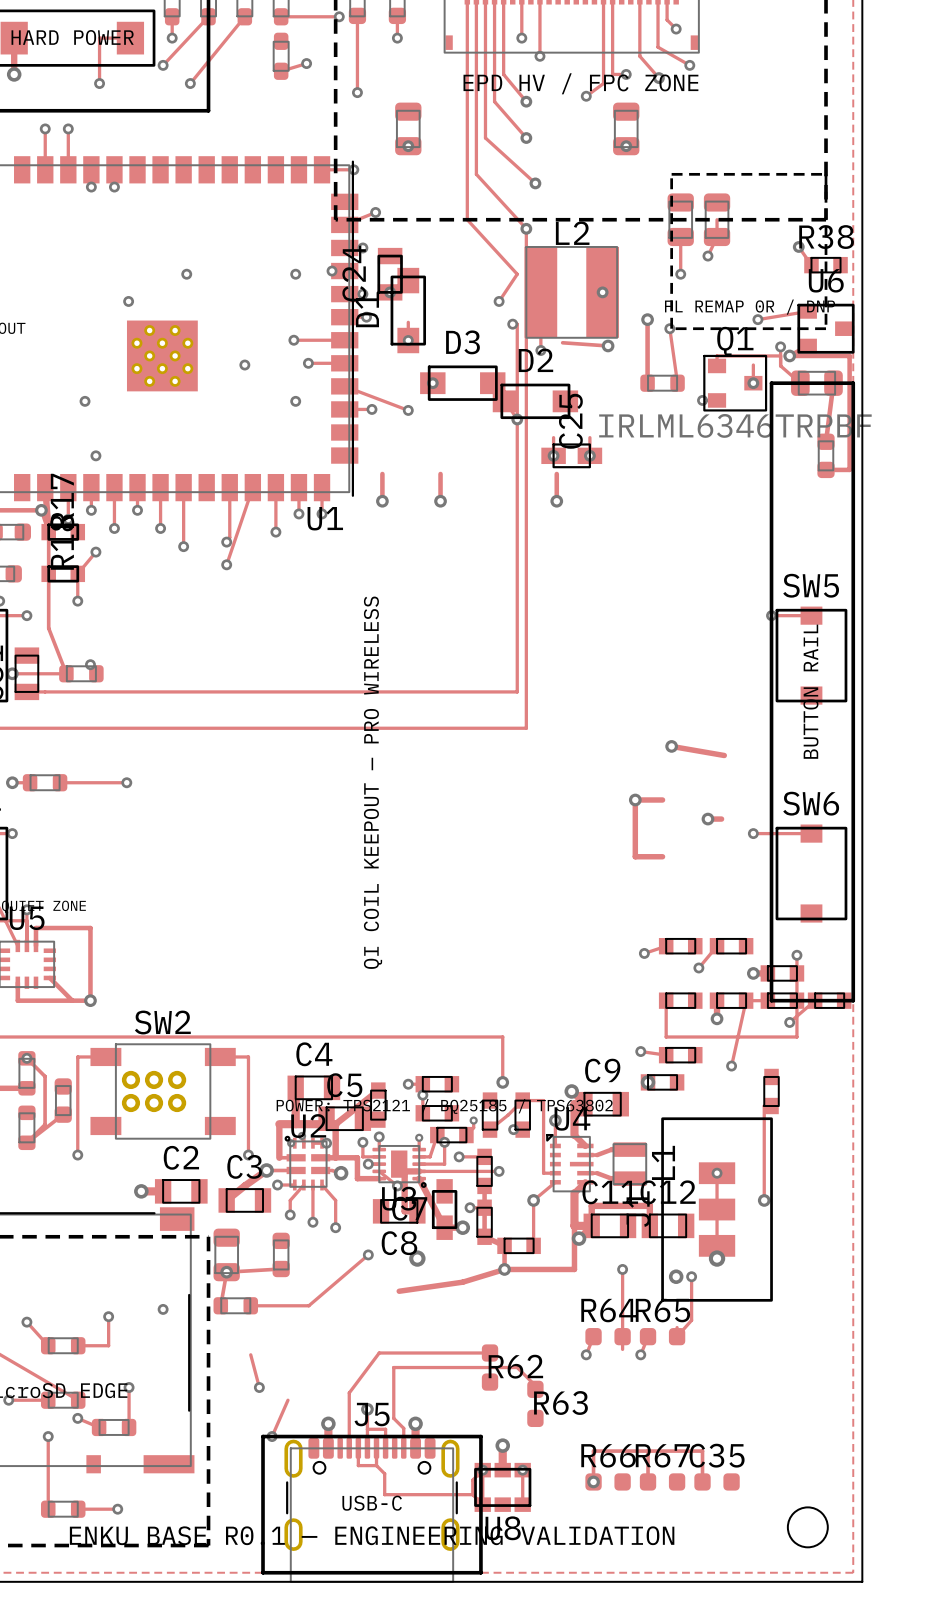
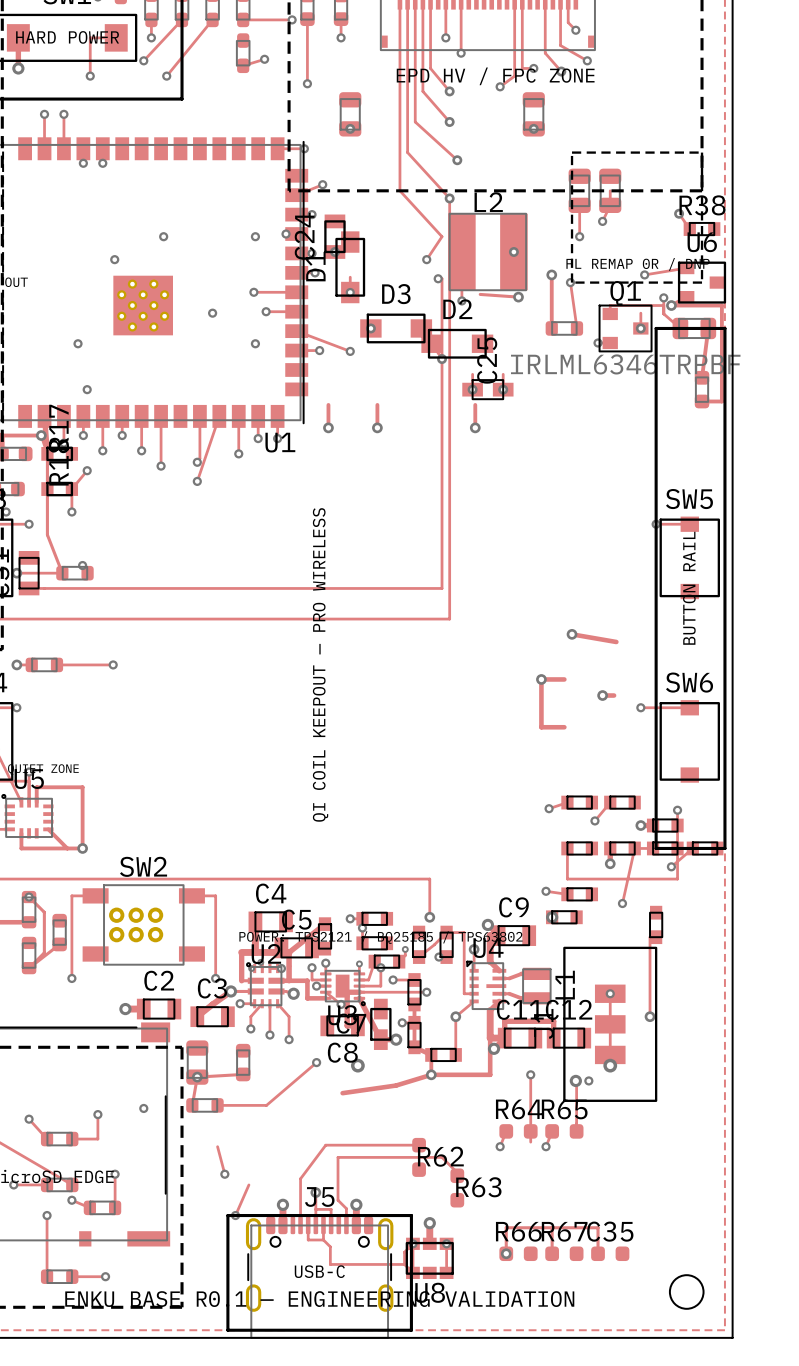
track: none -> (576, 1080) (576, 1123)
track: (691, 1276) (691, 1320) (677, 1336) -> none

